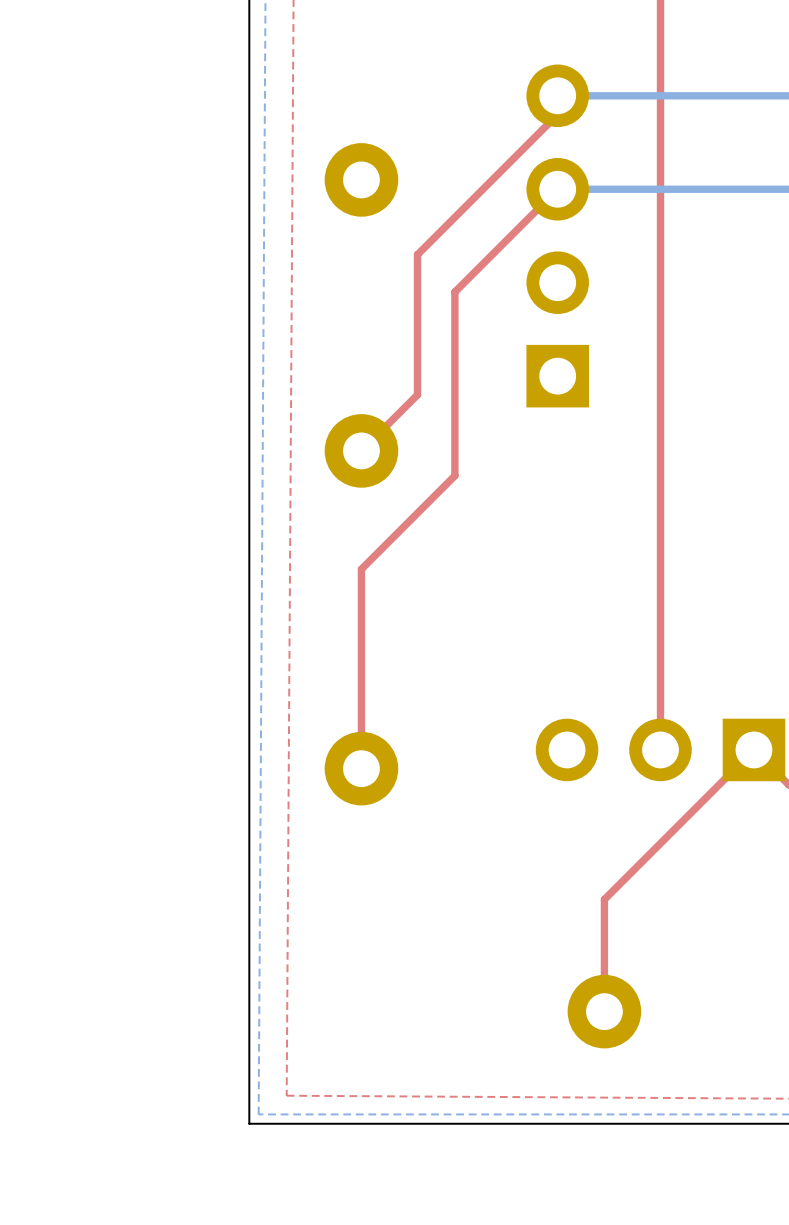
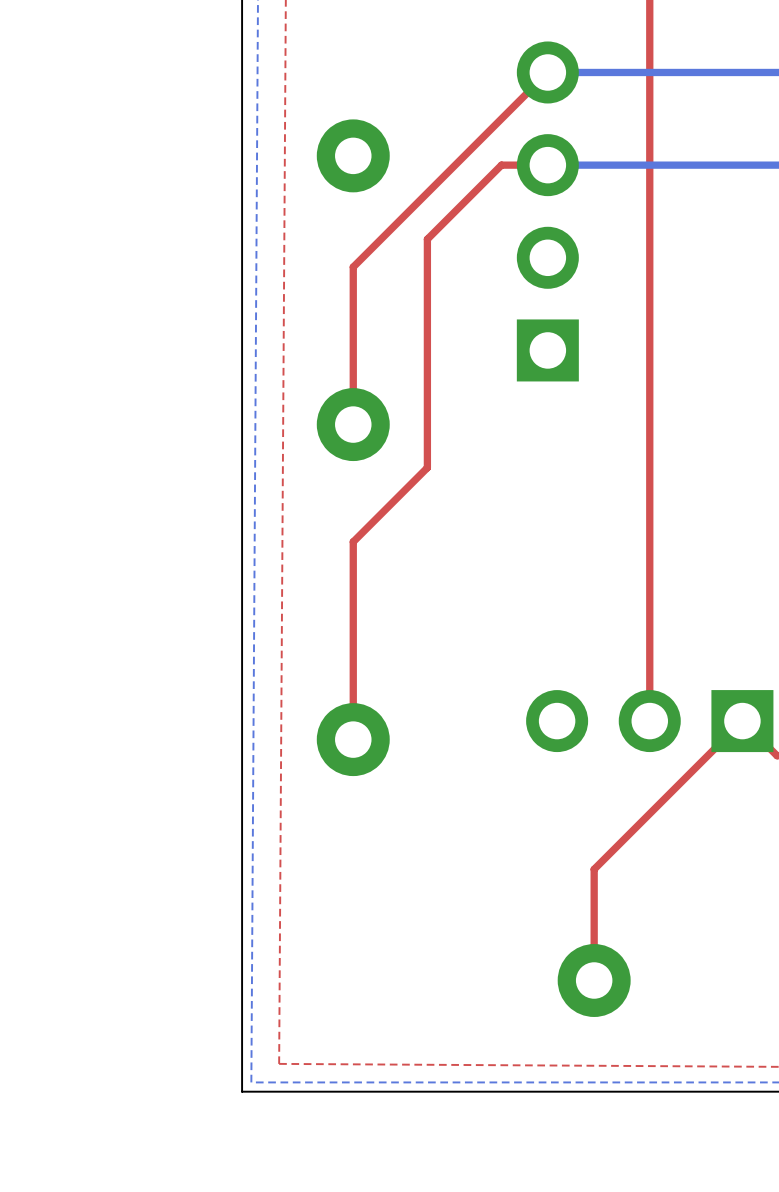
top track: (557, 95) (557, 114) (417, 254) (417, 394) (361, 450) -> (547, 72) (353, 267) (353, 424)
top track: (557, 189) (454, 292) (454, 475) (436, 494) -> (547, 165) (501, 165) (427, 239) (427, 467)

